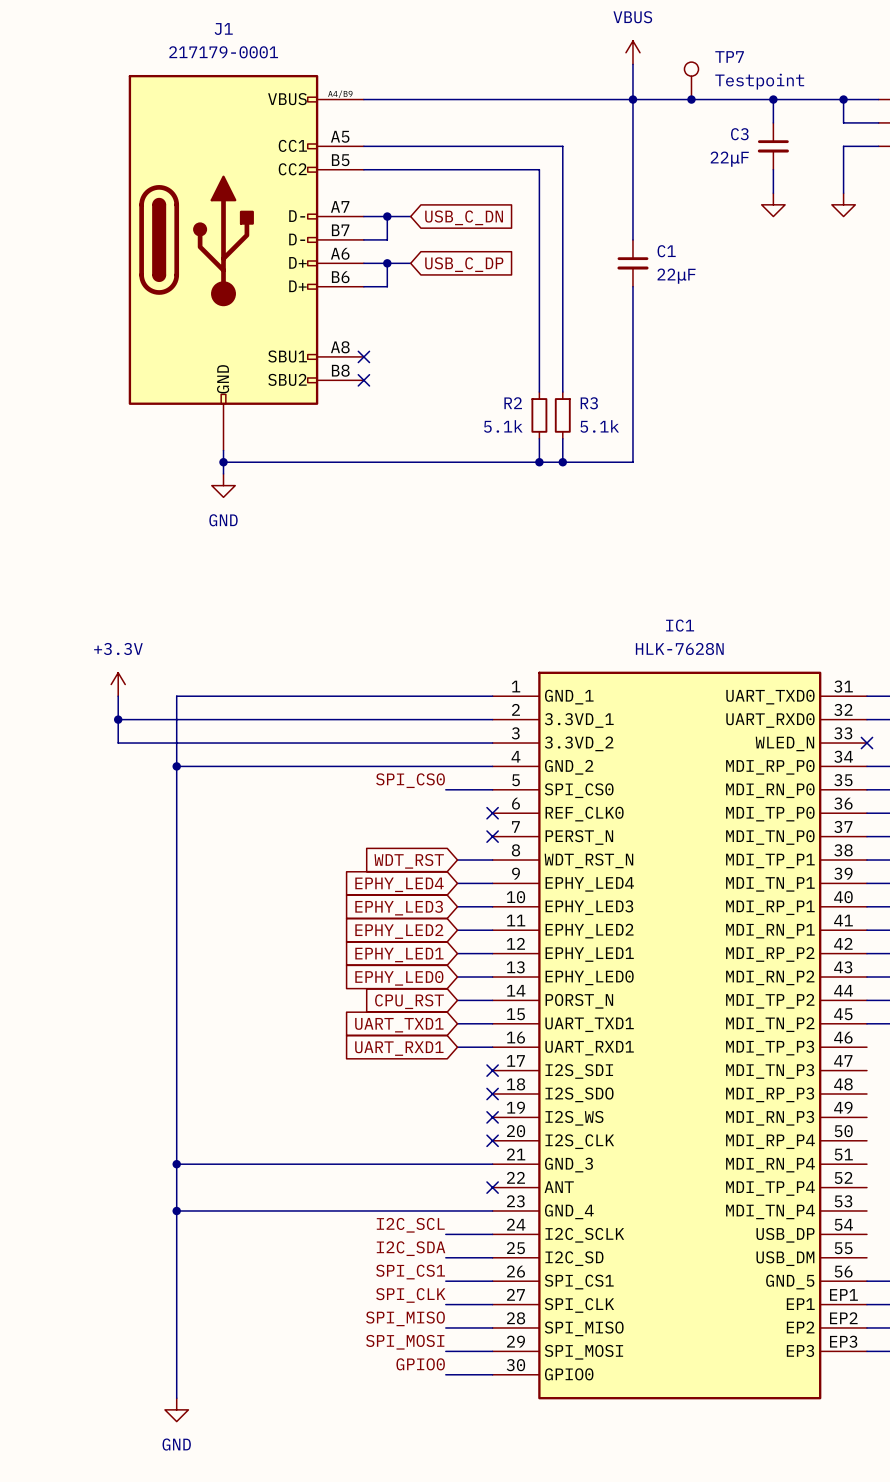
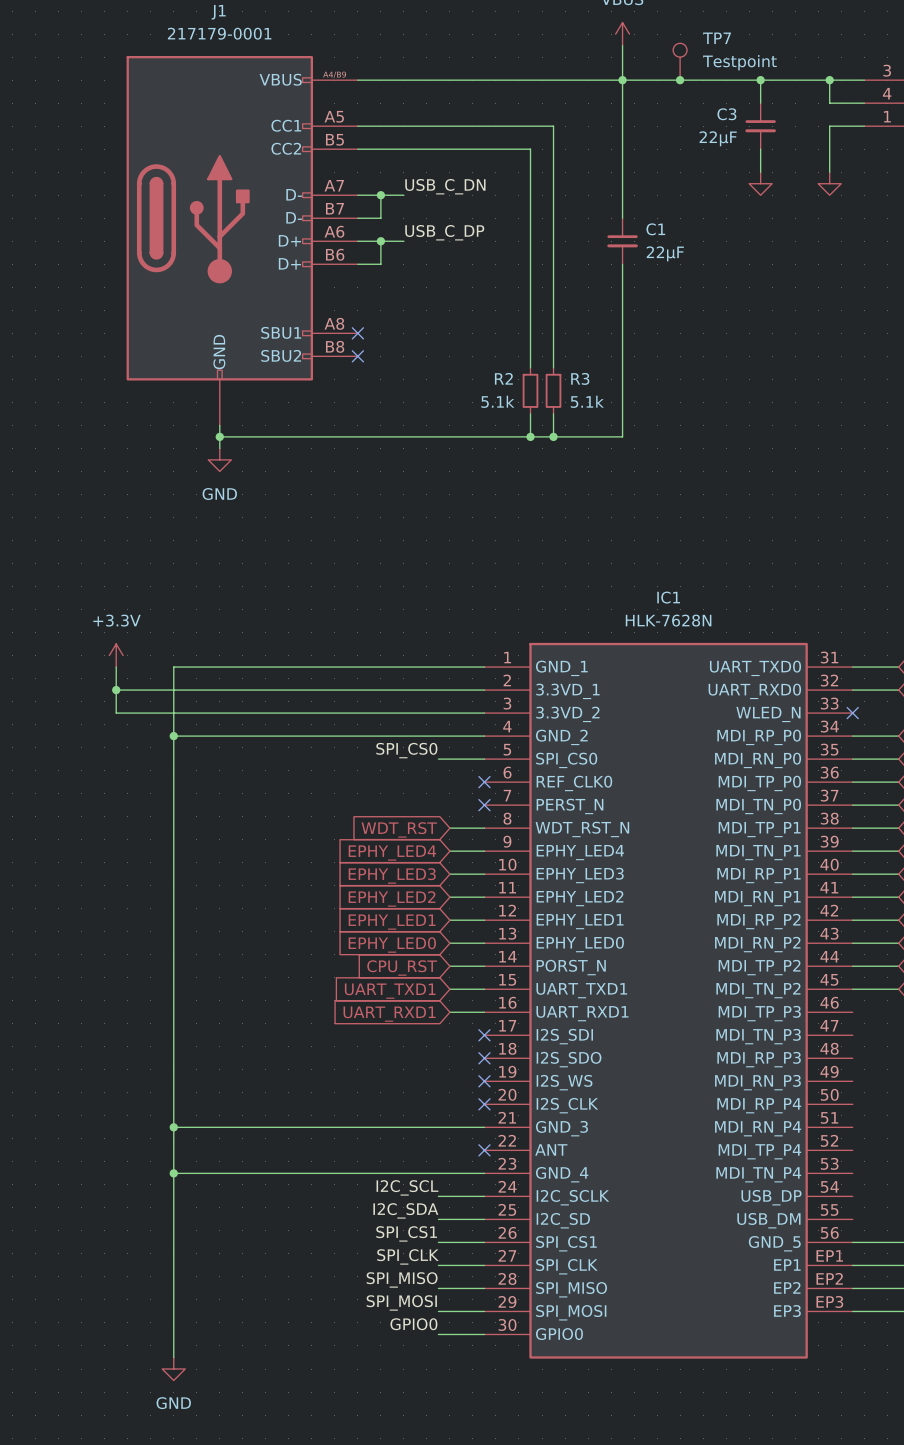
label: none -> USB_C_DN (445, 186)
global label: USB_C_DN (464, 217) -> none
label: none -> USB_C_DP (444, 232)
global label: USB_C_DP (464, 264) -> none

